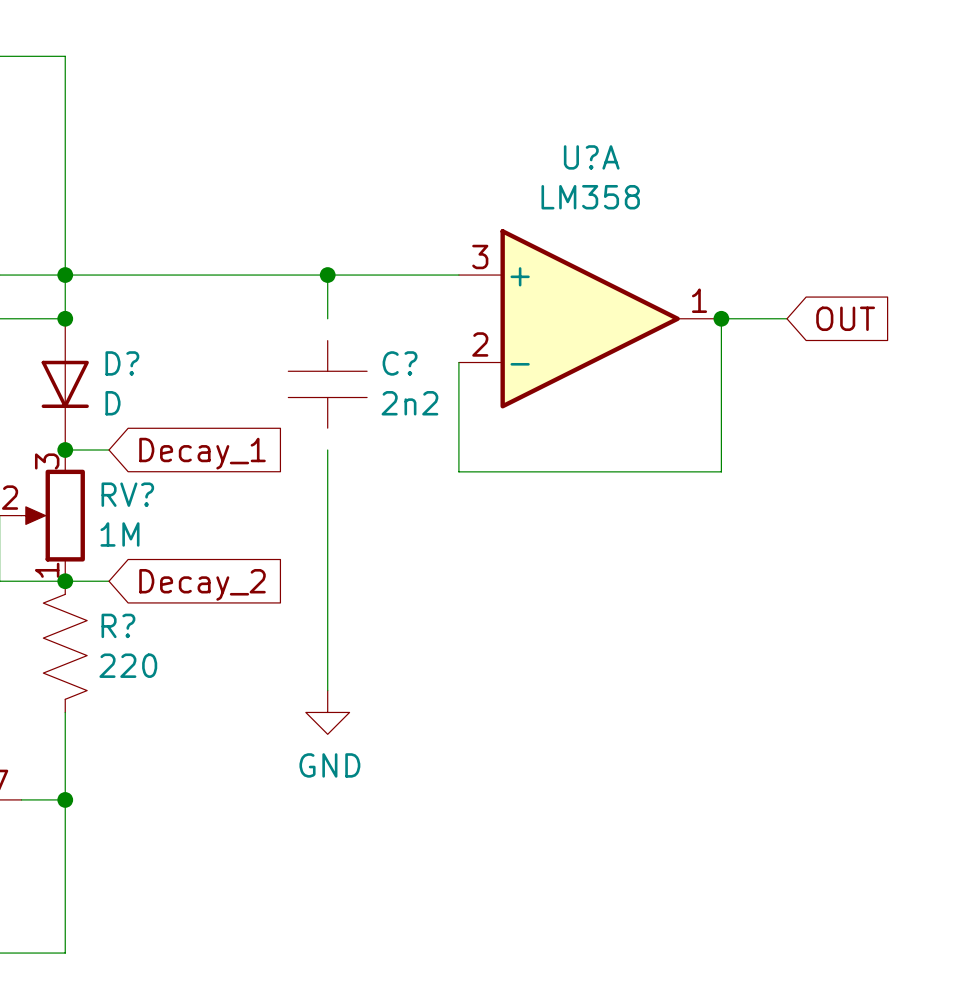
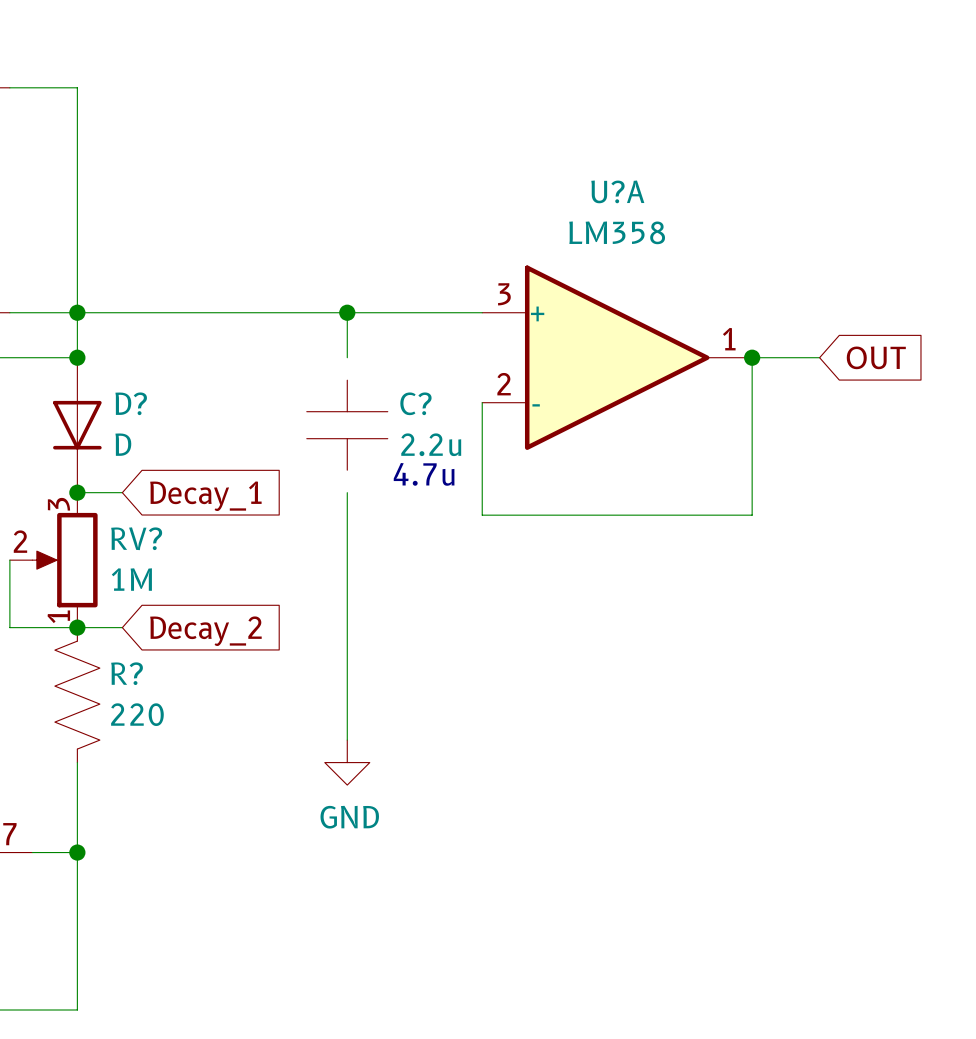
C? value: 2n2 (409, 403) -> 2.2u (431, 444)
text: none -> 4.7u (424, 474)

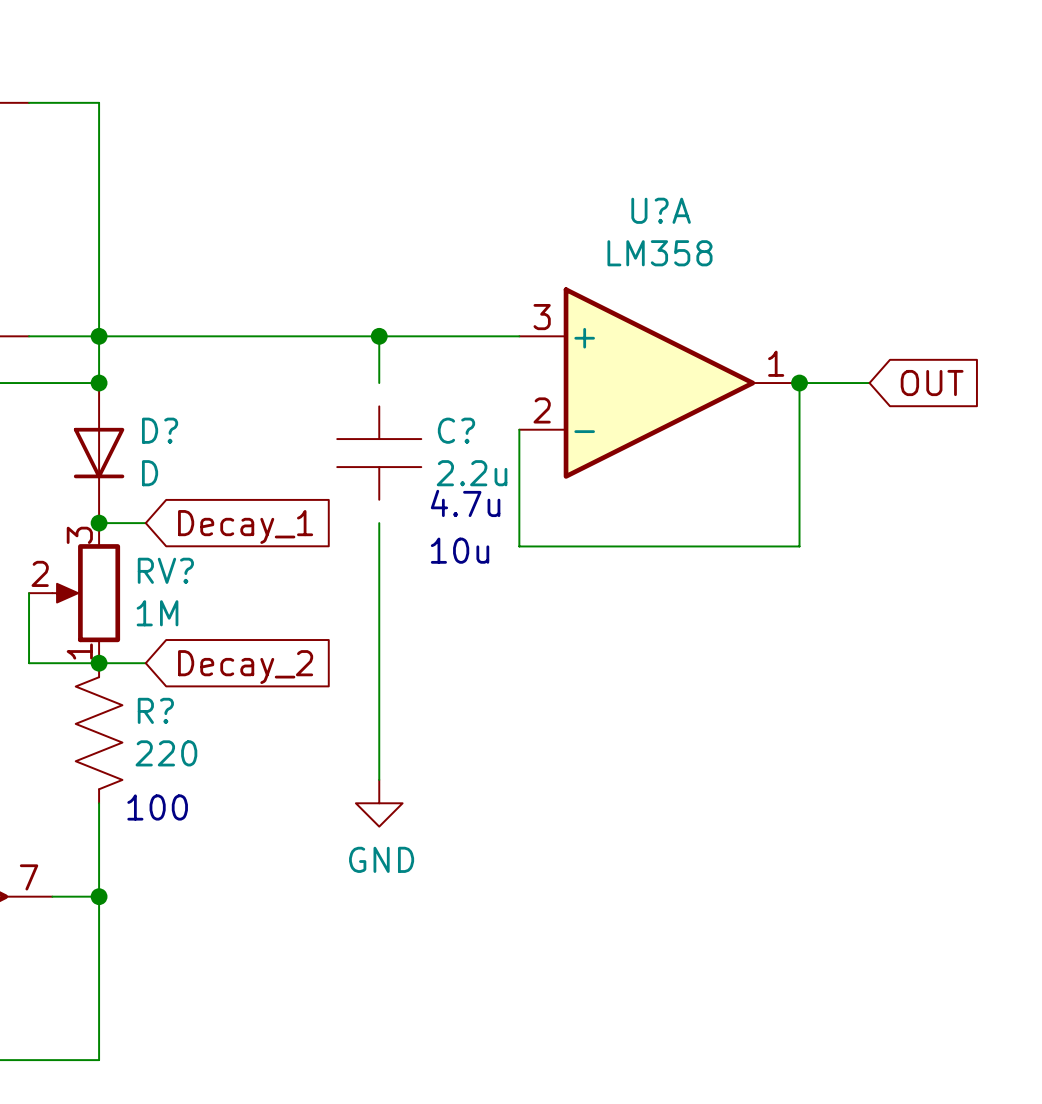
text: none -> 10u (460, 550)
text: none -> 100 (157, 807)

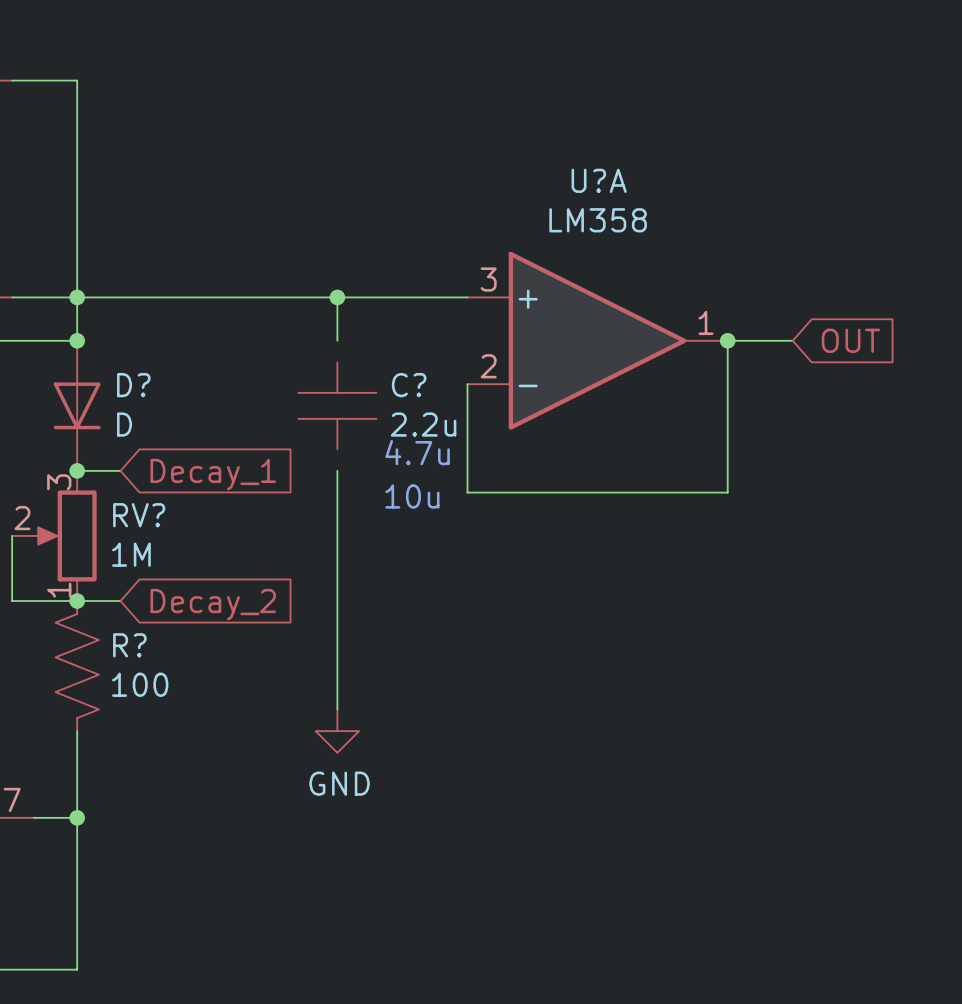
R? value: 220 (166, 753) -> 100 (140, 684)
text: 100 (157, 807) -> none

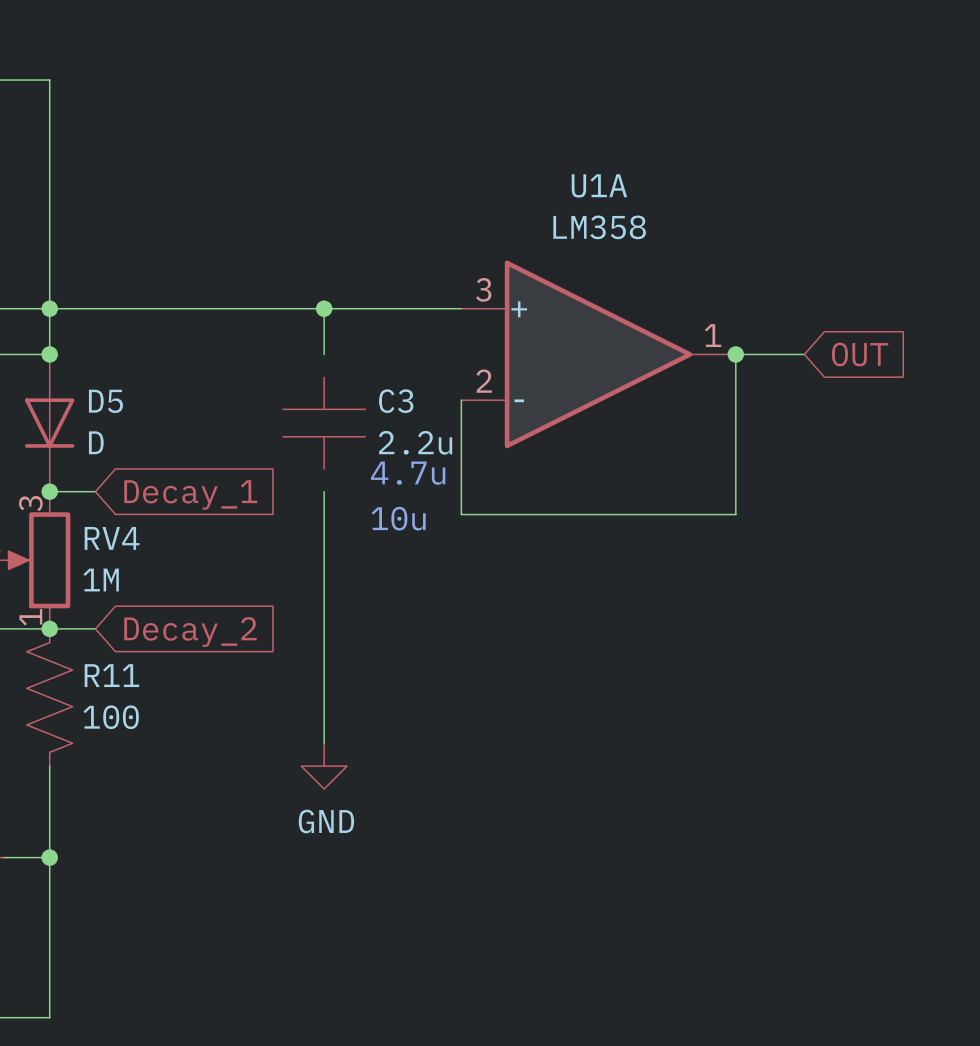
U?A name: U?A (599, 180) -> U1A (599, 185)
D? name: D? (133, 385) -> D5 (105, 401)
C? name: C? (409, 385) -> C3 (396, 401)
RV? name: RV? (139, 515) -> RV4 (112, 538)
R? name: R? (129, 645) -> R11 (111, 675)

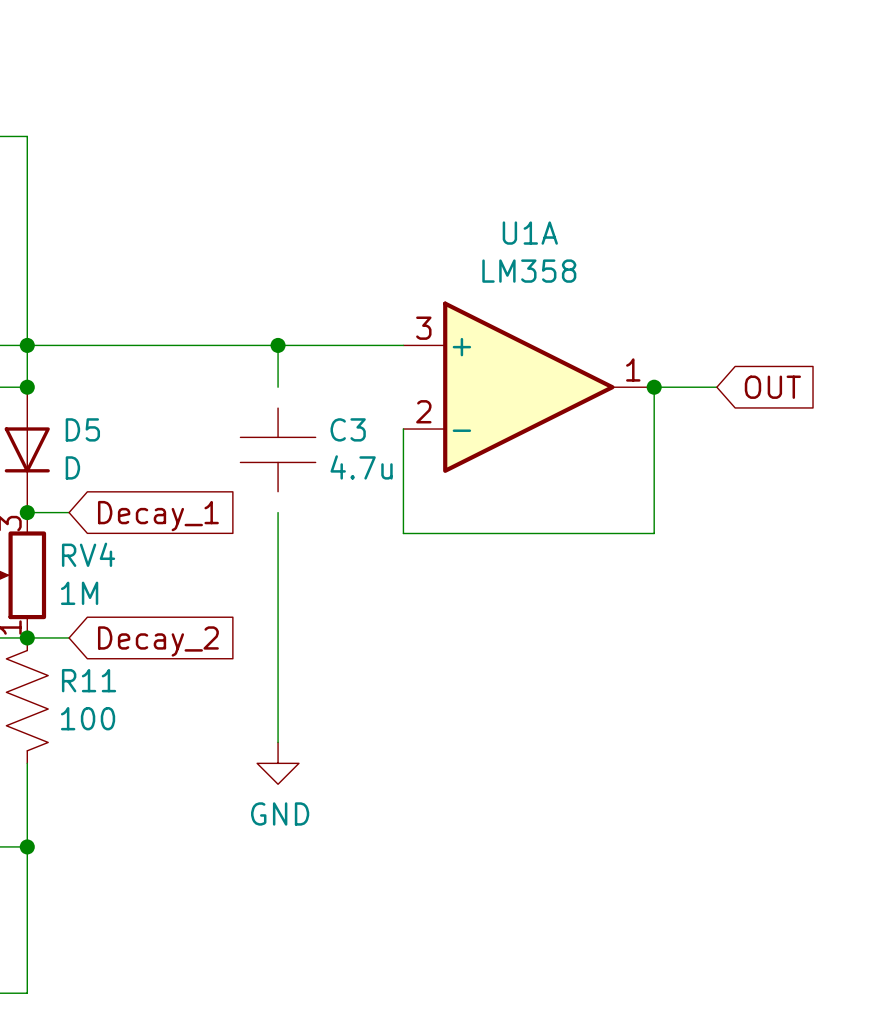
C3 value: 2.2u (415, 442) -> 4.7u (361, 467)
text: 4.7u (408, 473) -> none
text: 10u (398, 518) -> none

